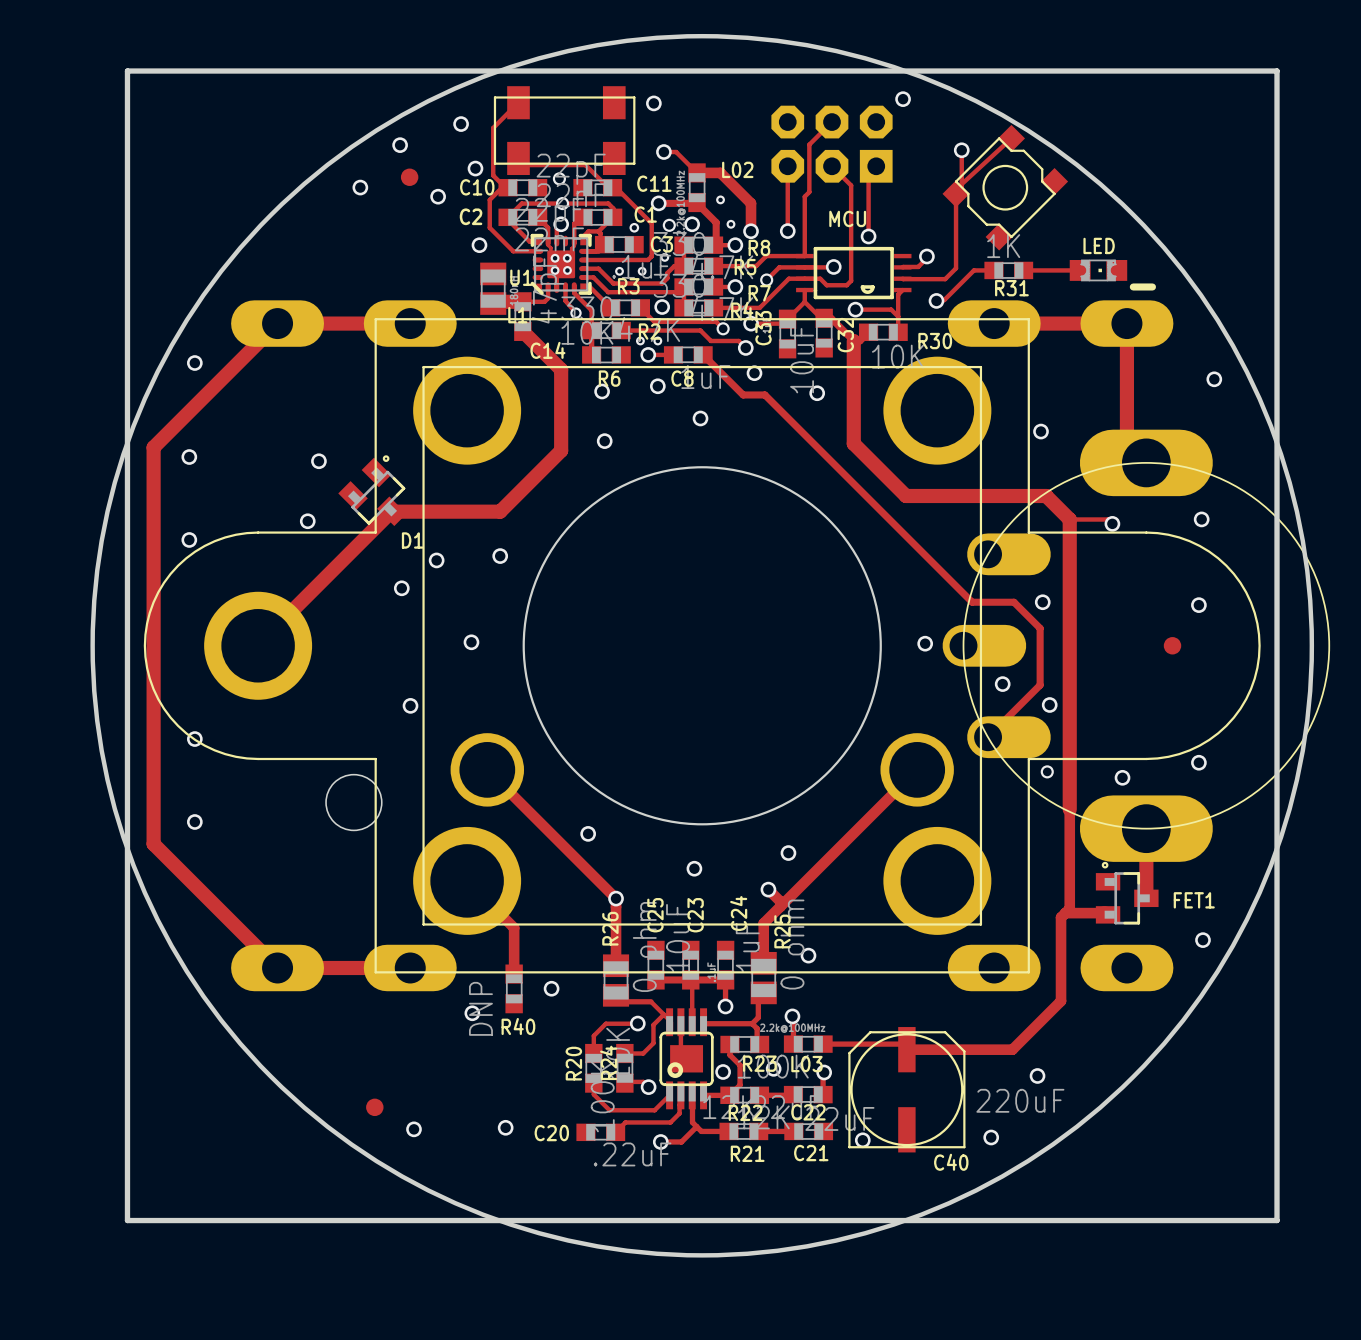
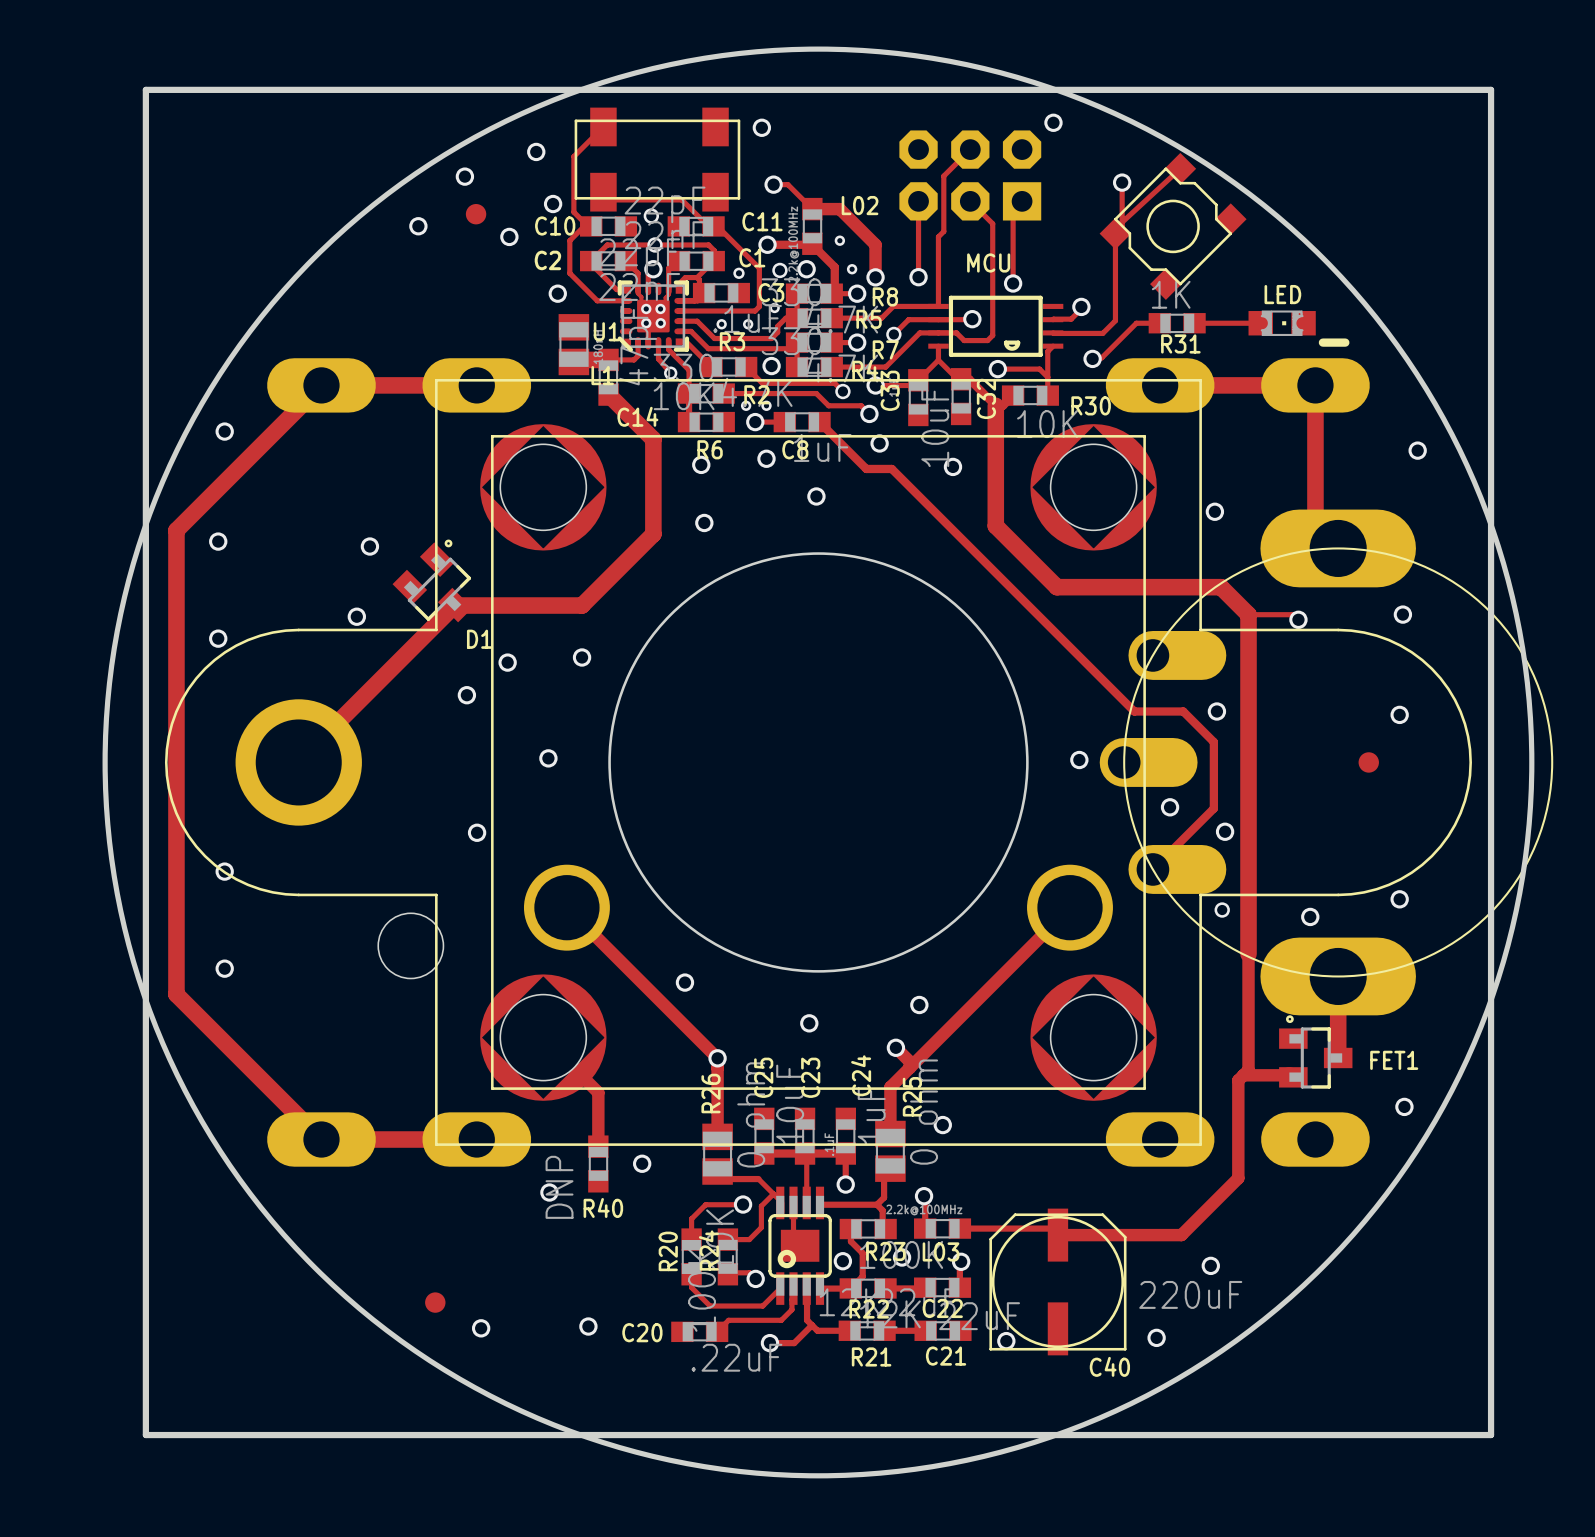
part footprint: [143, 318, 1261, 974] -> [164, 379, 1472, 1146]

